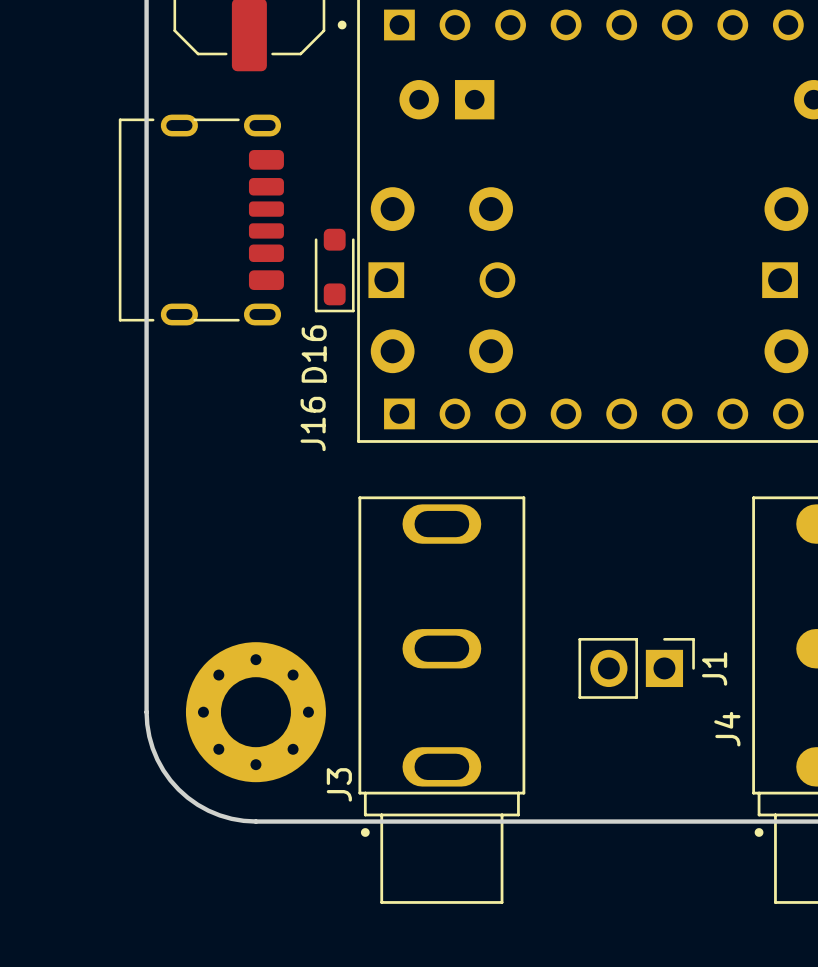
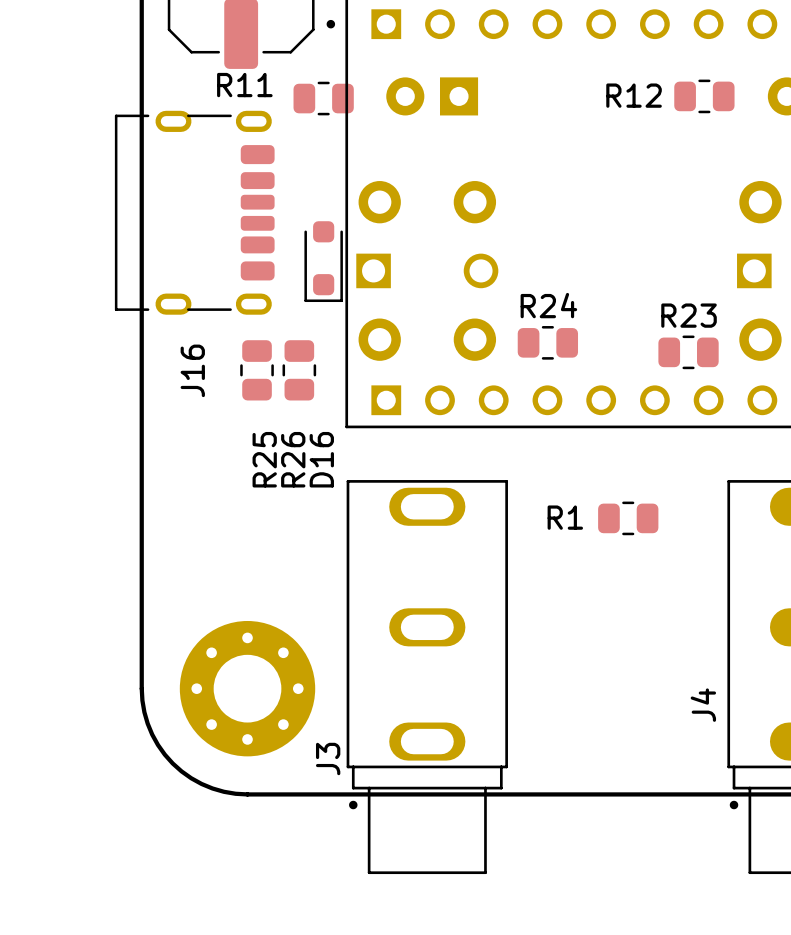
R12: none -> (704, 96)
R11: none -> (323, 98)
D16 name position: D16 (314, 354) -> D16 (321, 459)
R24: none -> (547, 342)
R23: none -> (688, 352)
R25: none -> (257, 370)
R26: none -> (299, 370)
J16 name position: J16 (313, 423) -> J16 (192, 370)
R1: none -> (628, 518)
J1: (636, 668) -> none

